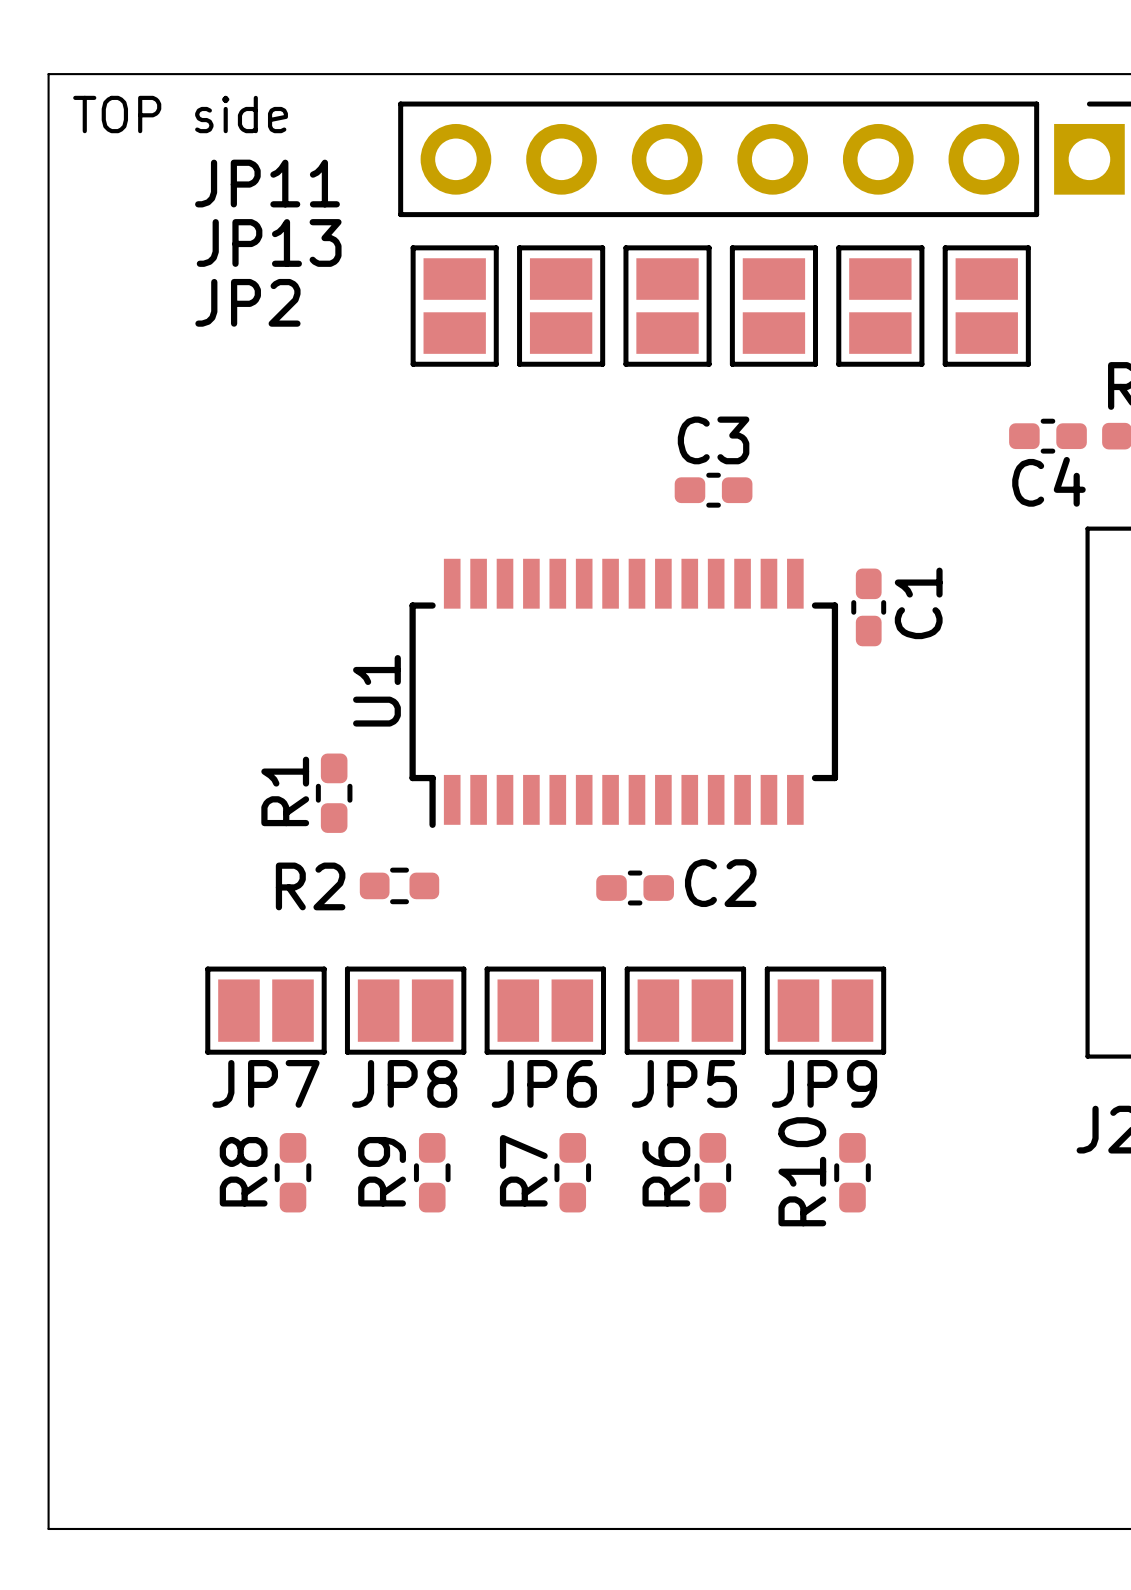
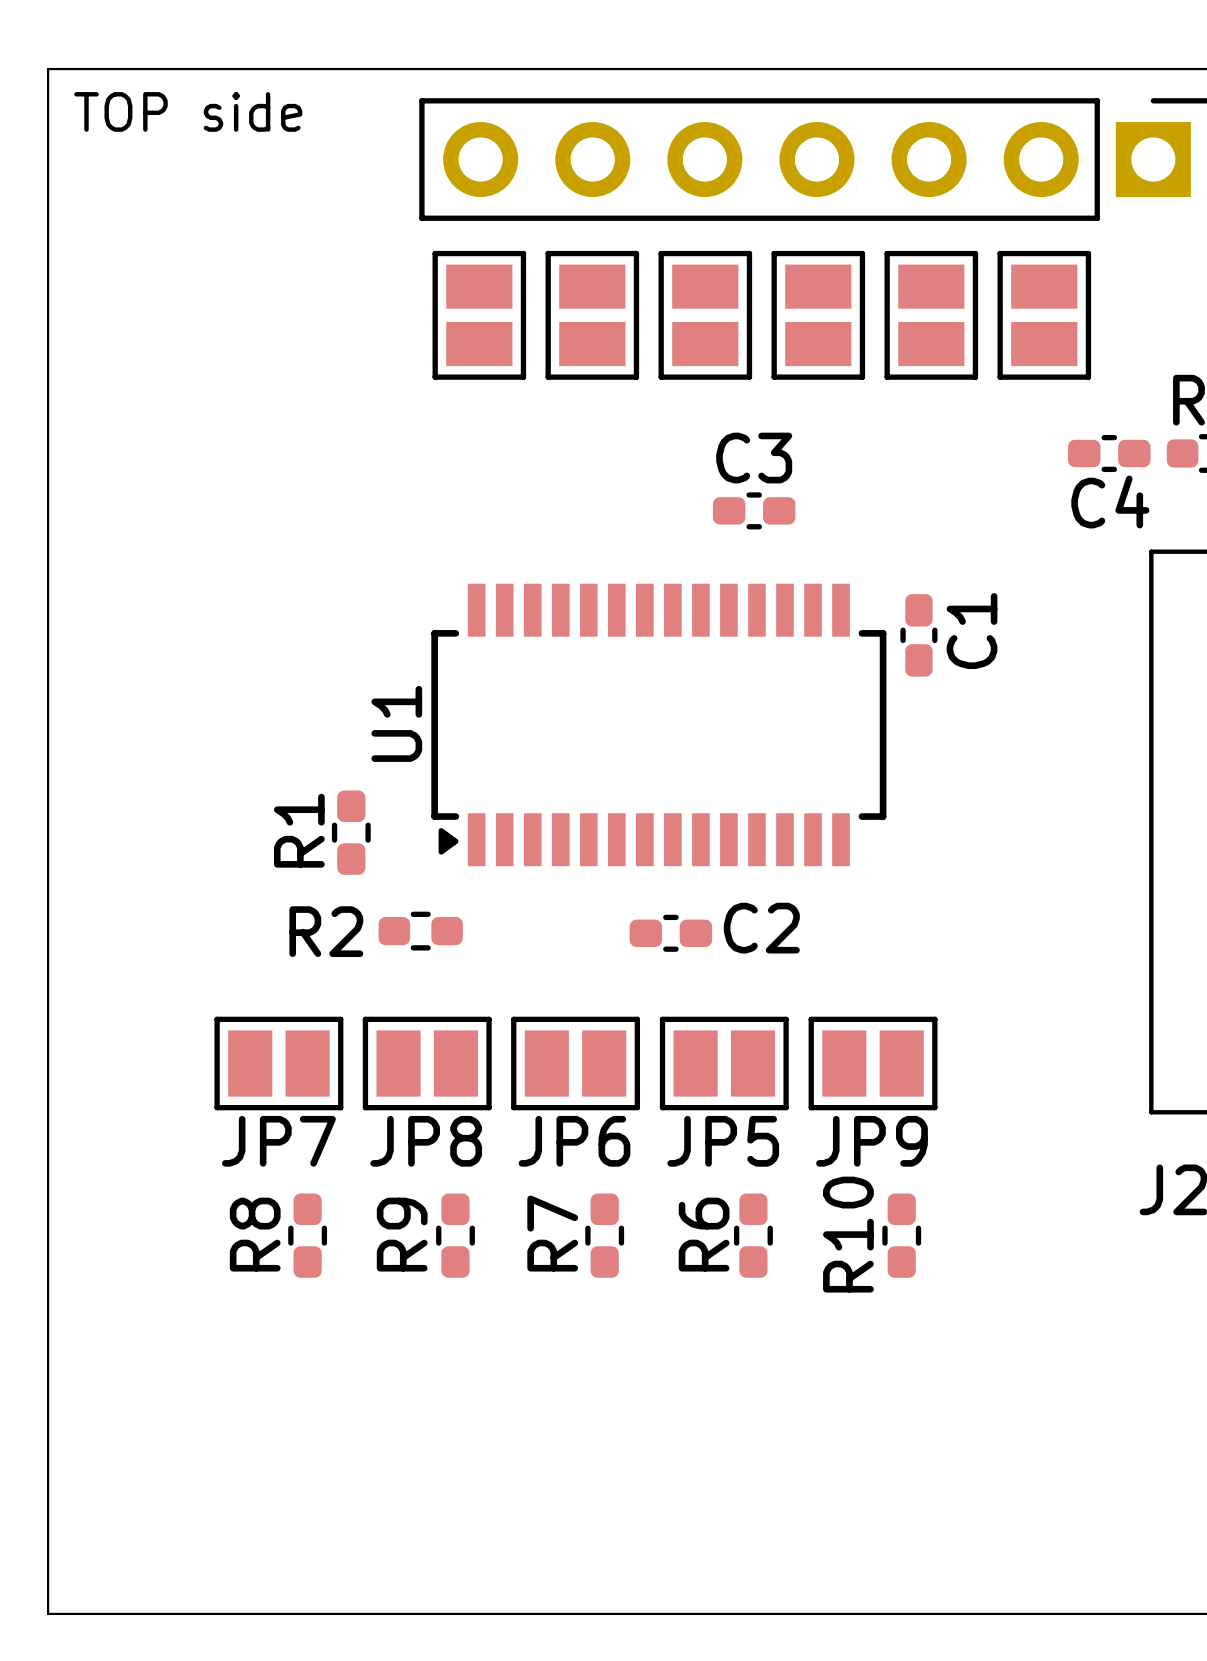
JP11 name: JP11 (267, 183) -> none
JP13 name: JP13 (269, 242) -> none
JP2 name: JP2 (247, 302) -> none
U1 footprint: [409, 558, 839, 828] -> [431, 583, 887, 867]

